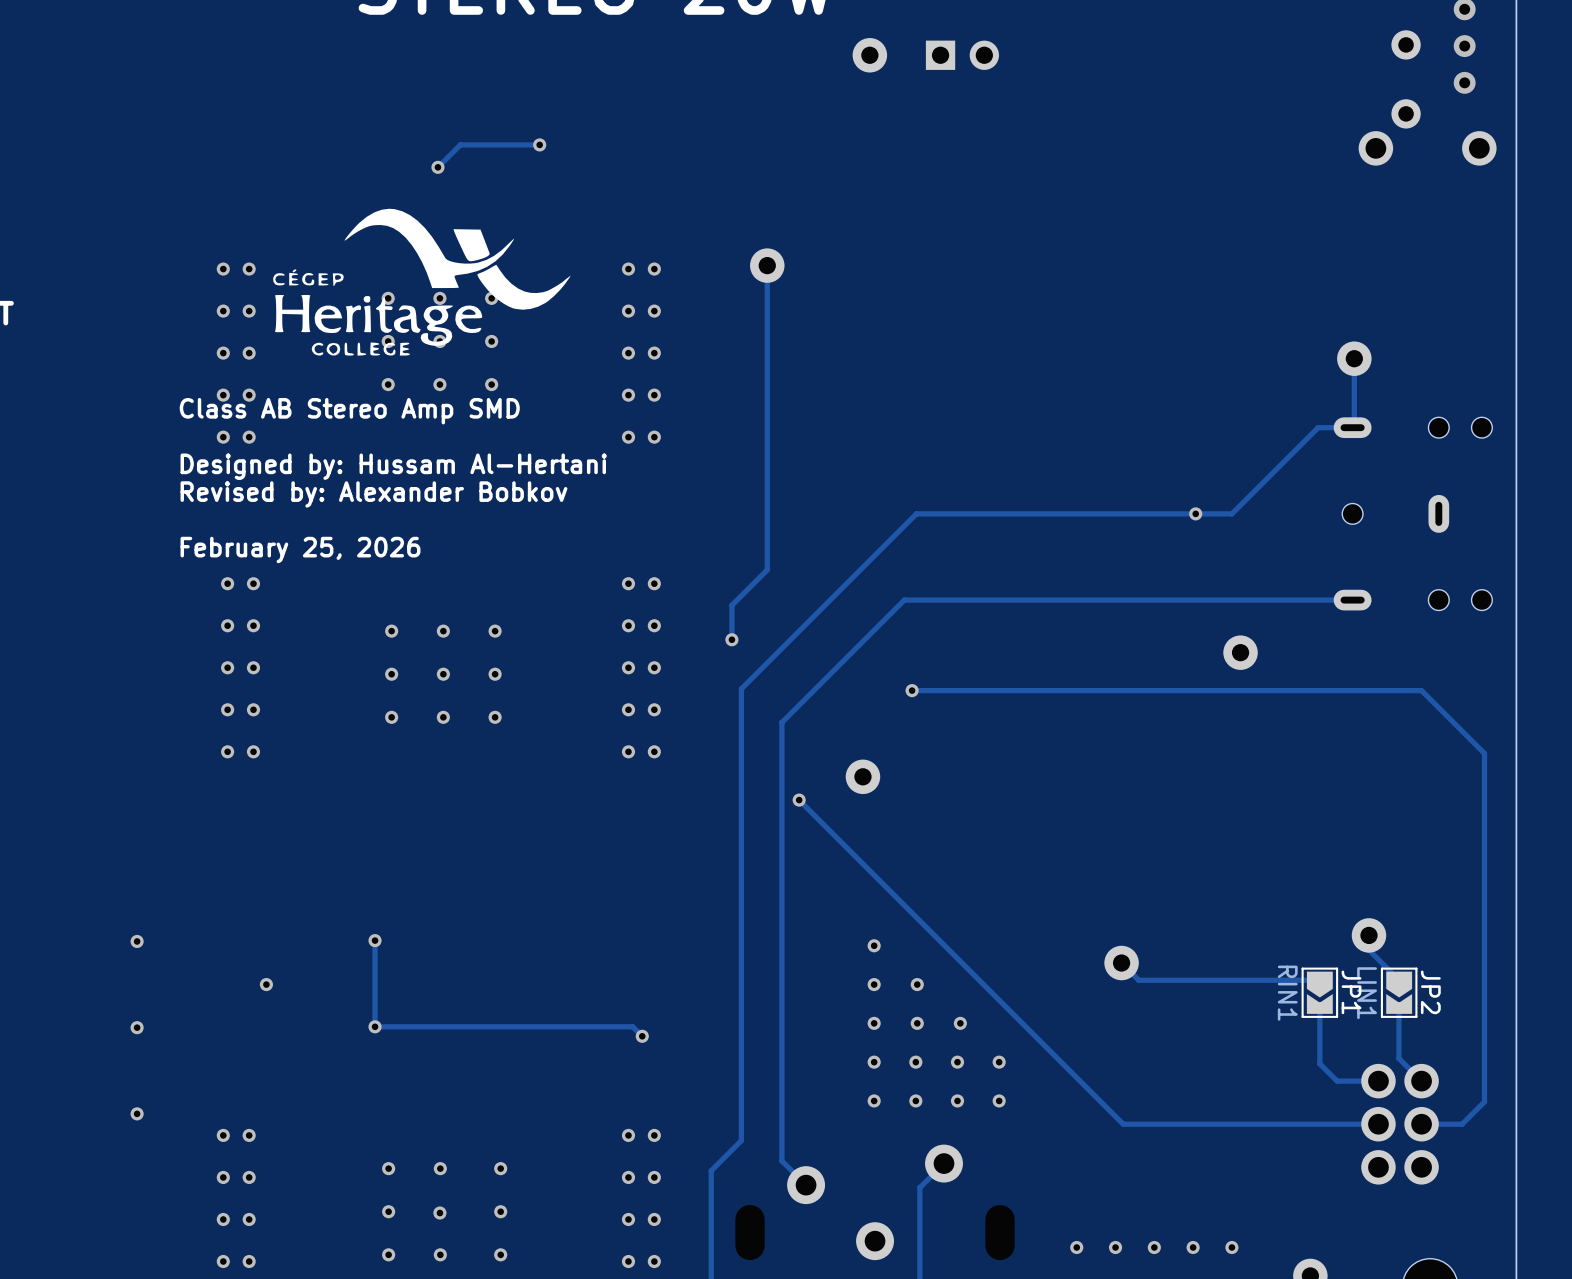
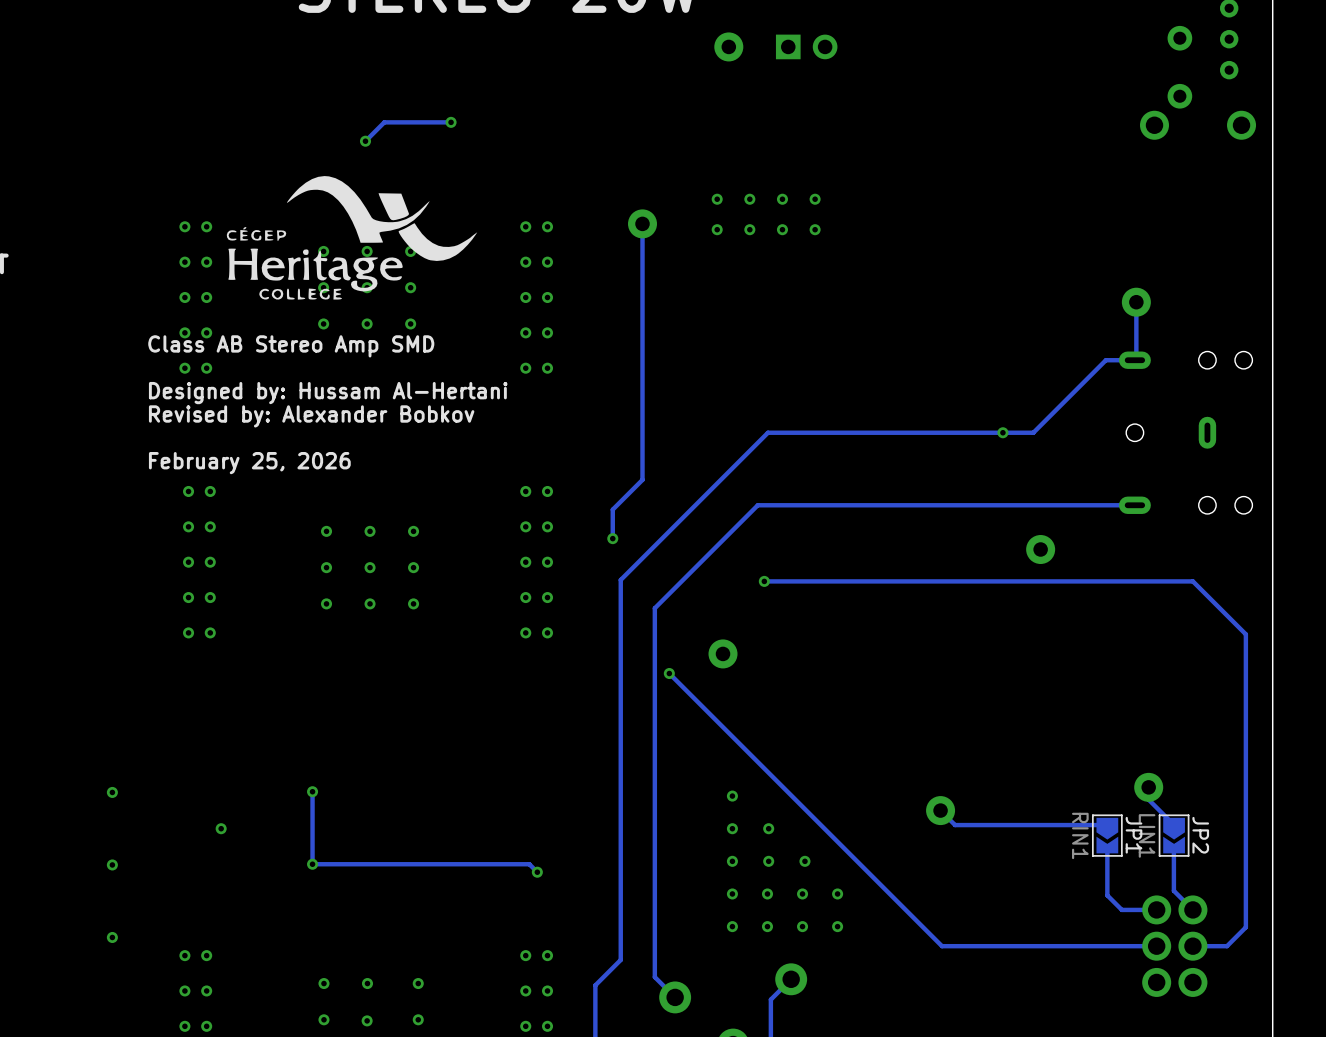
via: none -> (717, 199)
via: none -> (749, 199)
via: none -> (782, 199)
via: none -> (815, 199)
via: none -> (717, 229)
via: none -> (749, 229)
via: none -> (782, 229)
via: none -> (815, 229)

